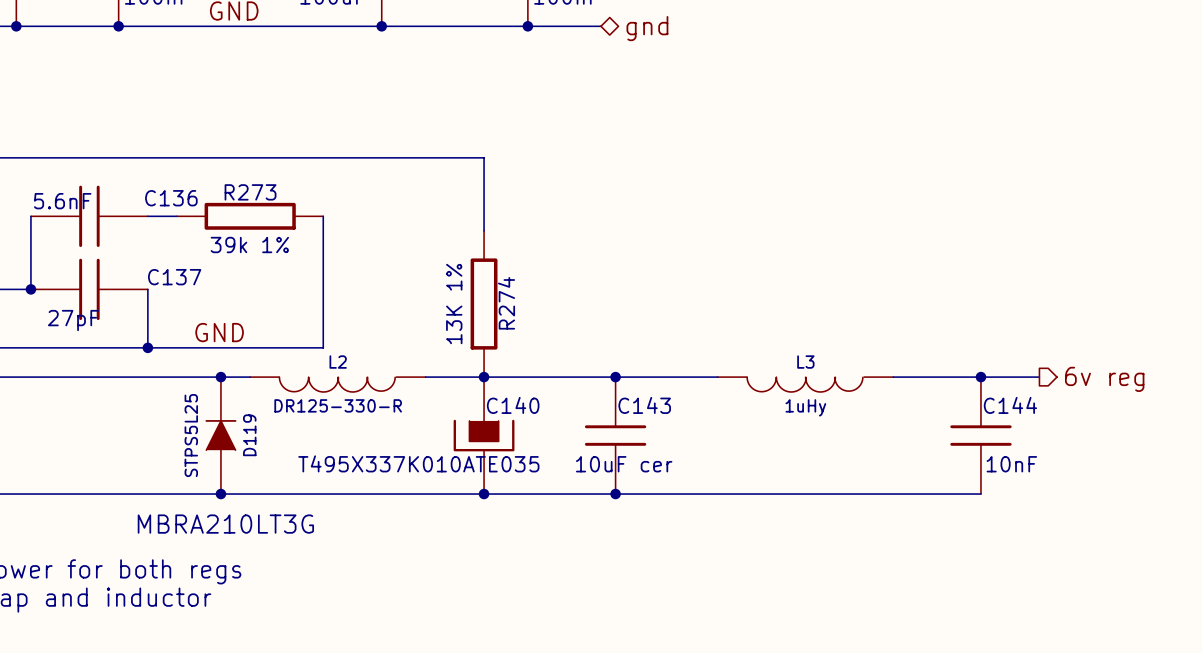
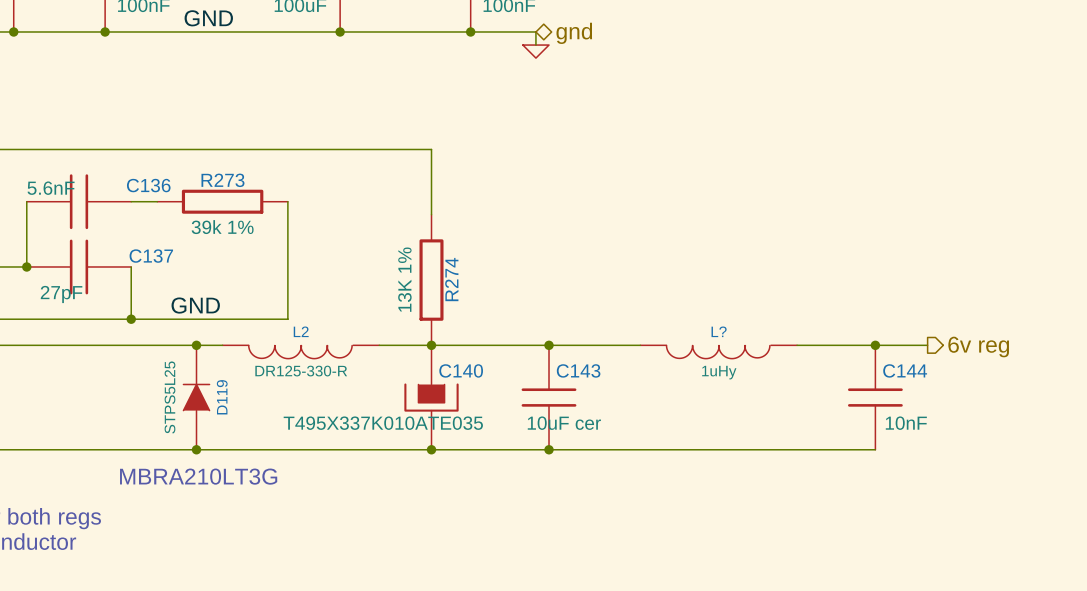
wire: none -> (535, 31) (535, 45)
power symbol: none -> (535, 51)
L3 name: L3 (805, 362) -> L? (719, 331)

